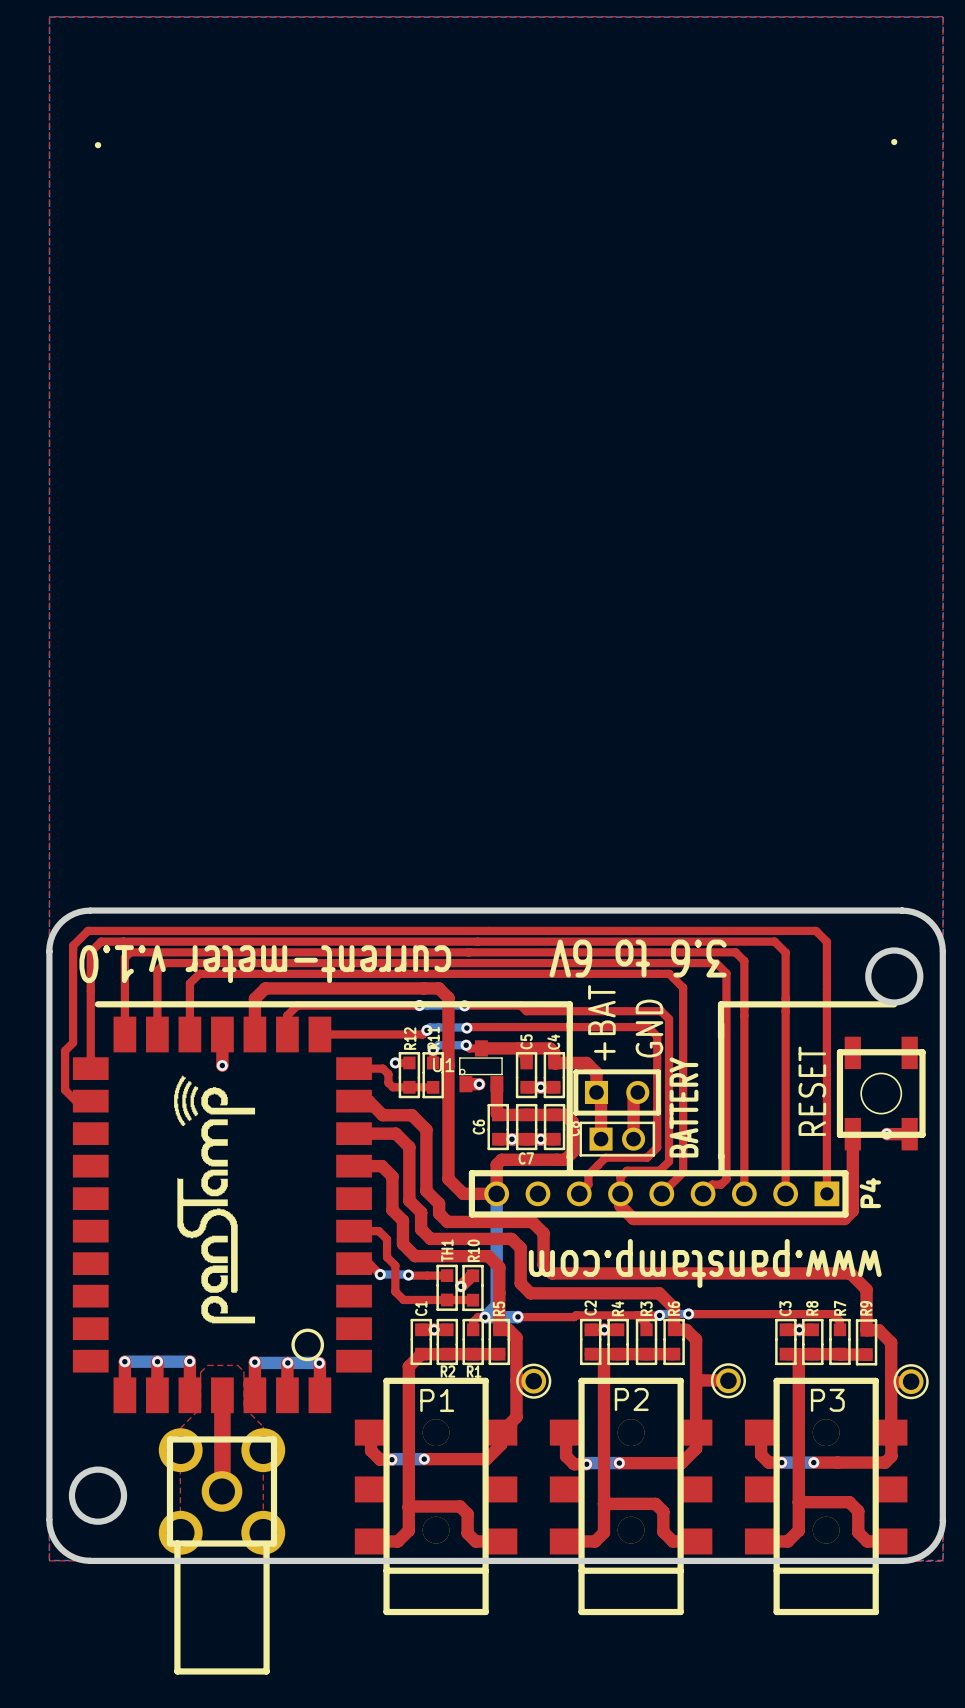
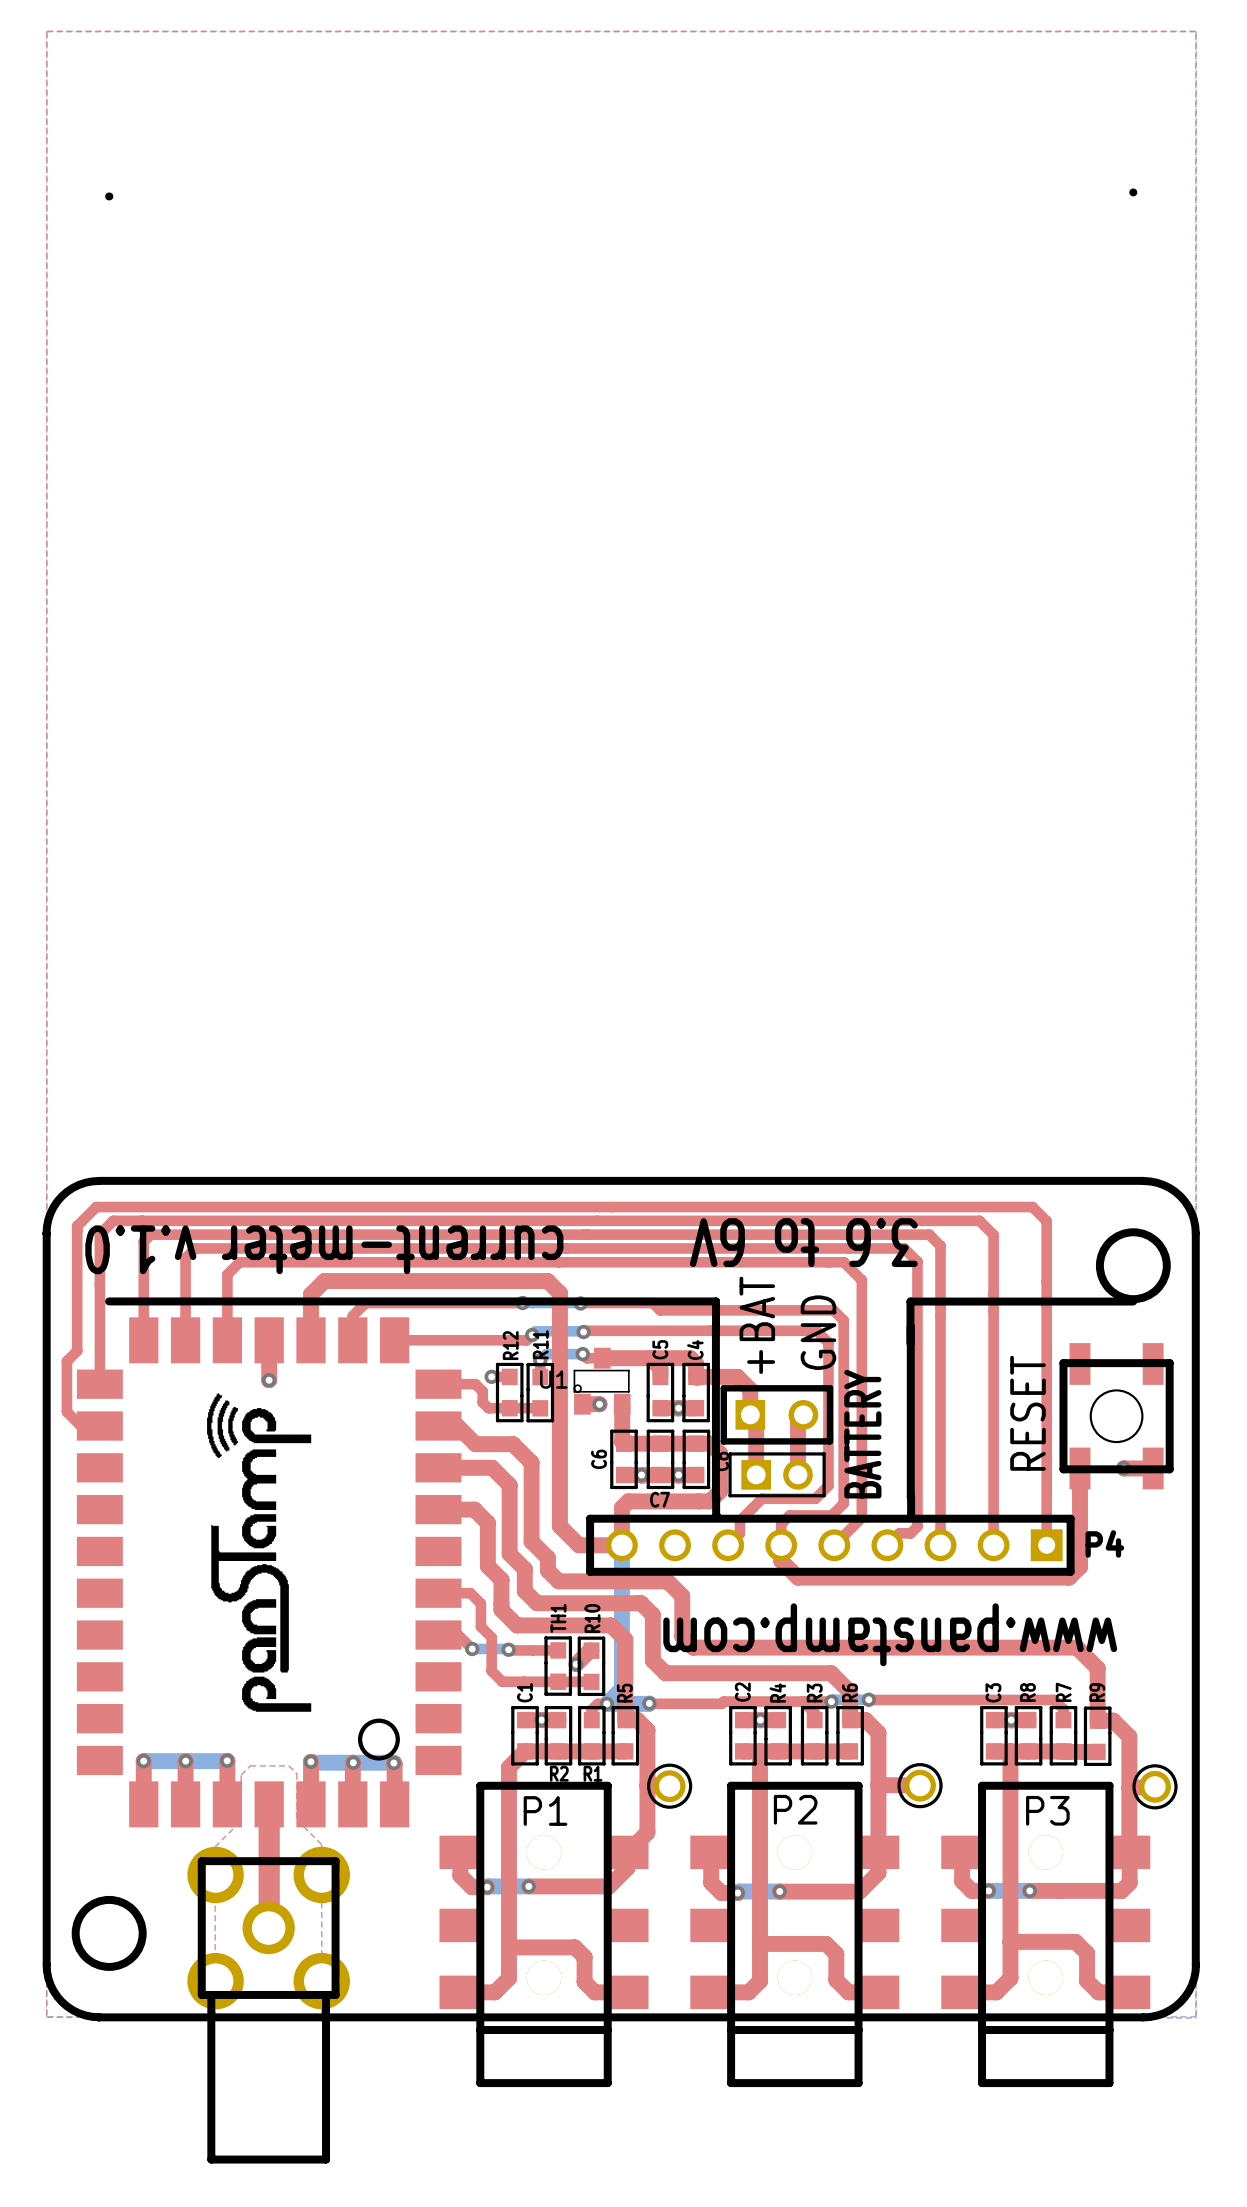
P4 name rotation: 0° (870, 1193) -> 90° clockwise (1104, 1543)

